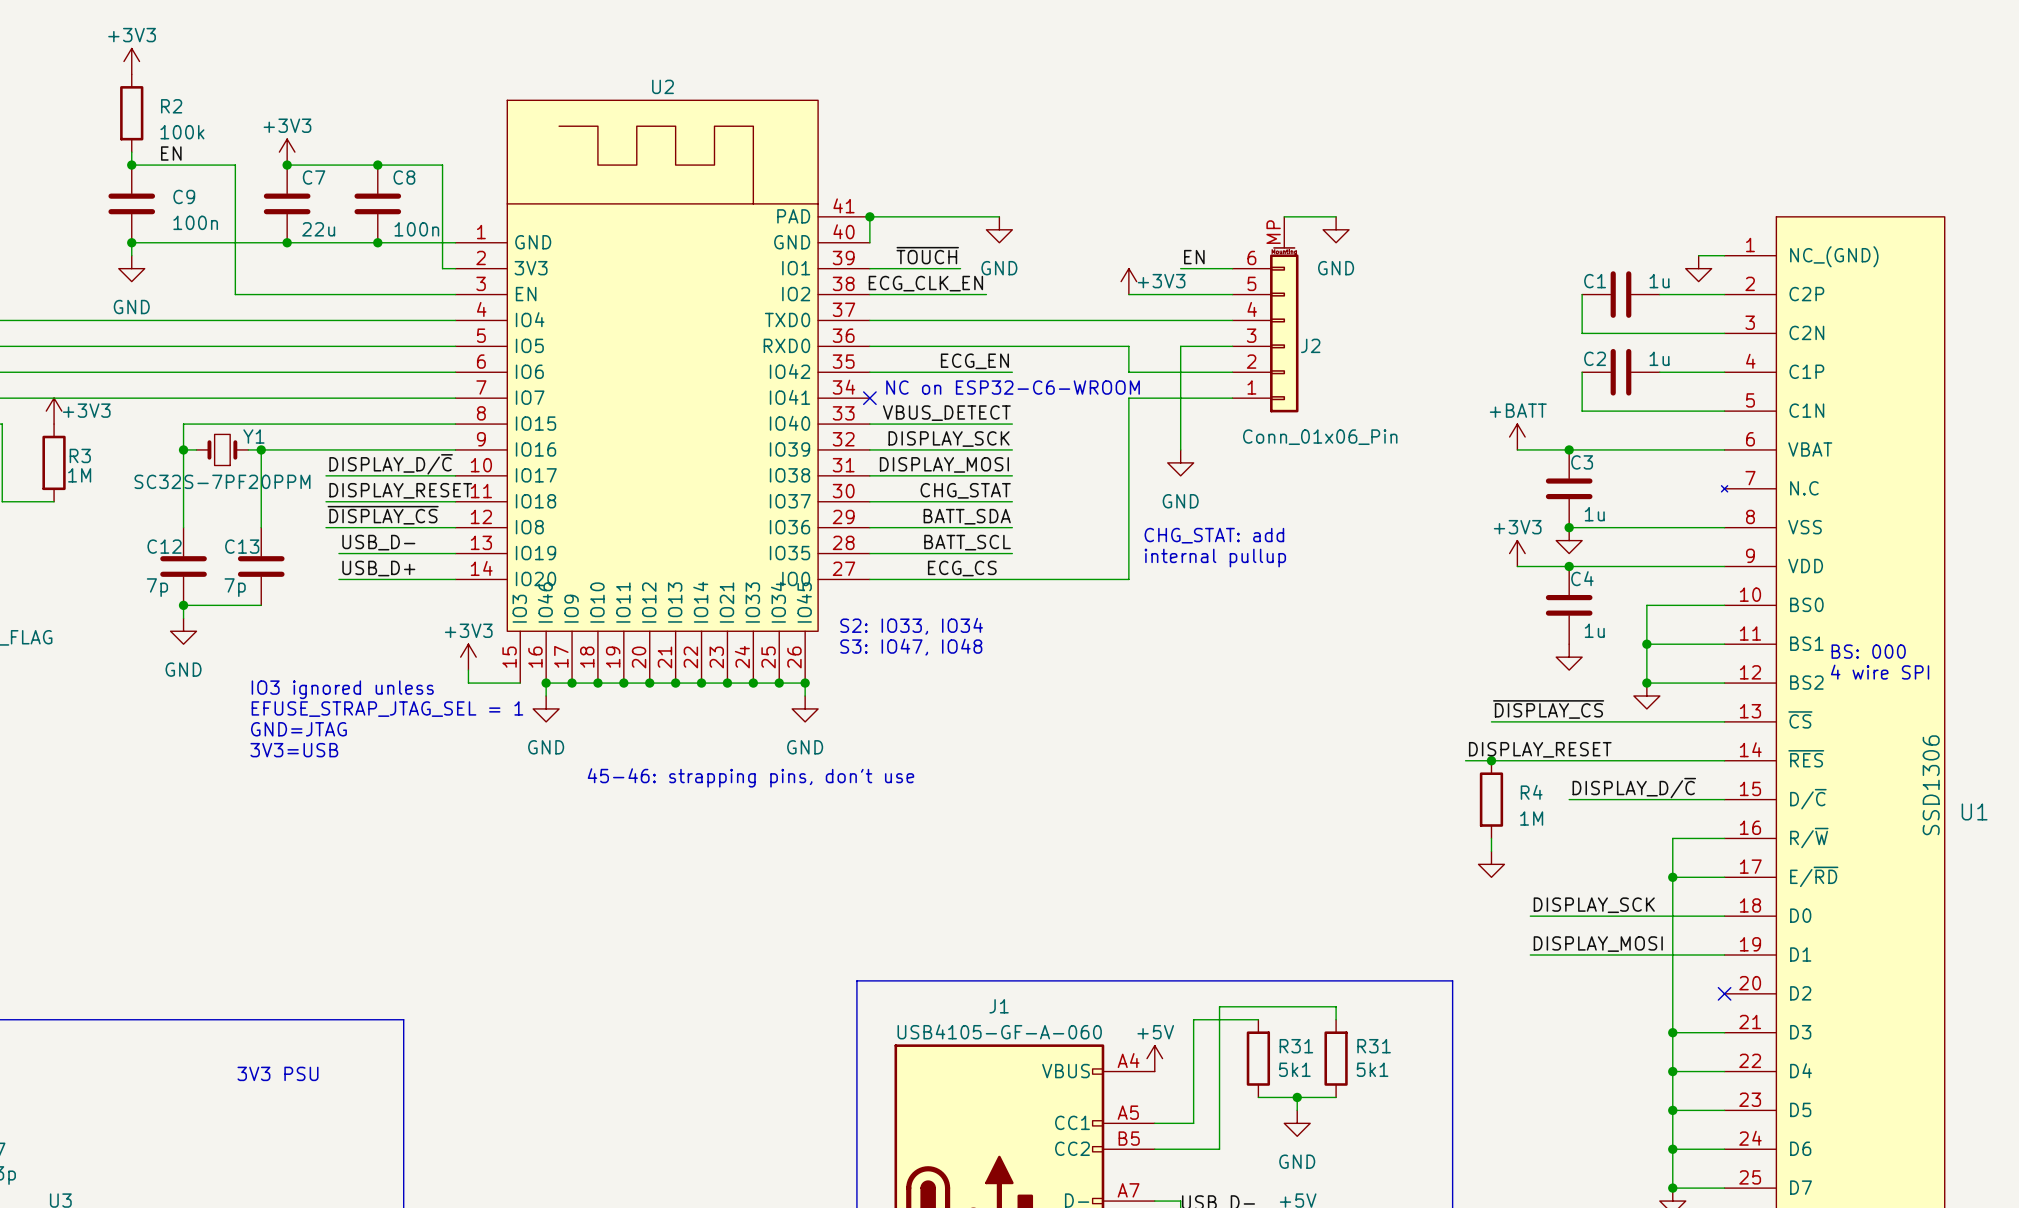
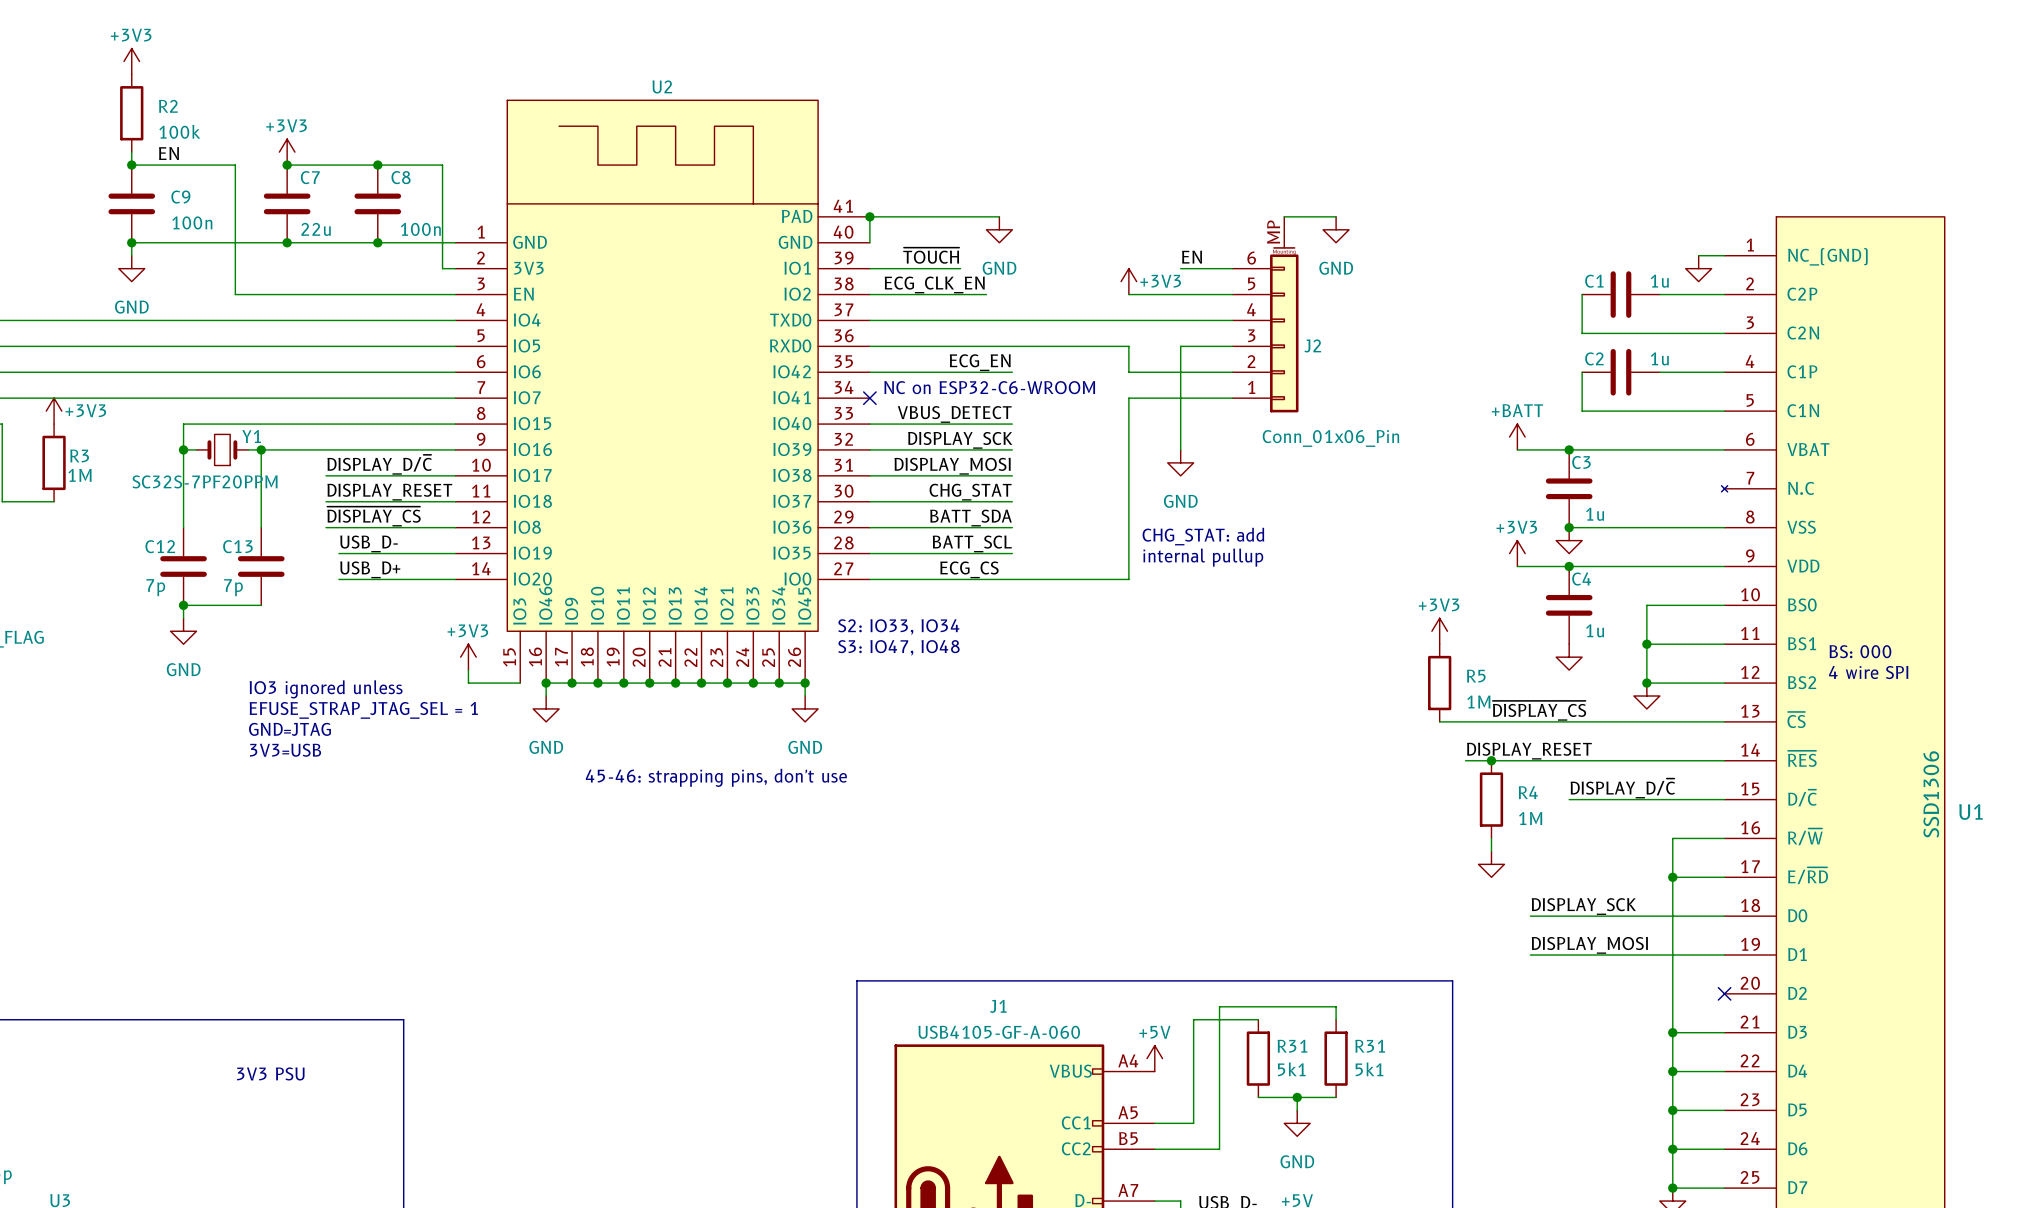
power symbol: none -> +3V3 (1439, 631)
R5: none -> 1M (1439, 683)
wire: none -> (1439, 721) (1491, 721)

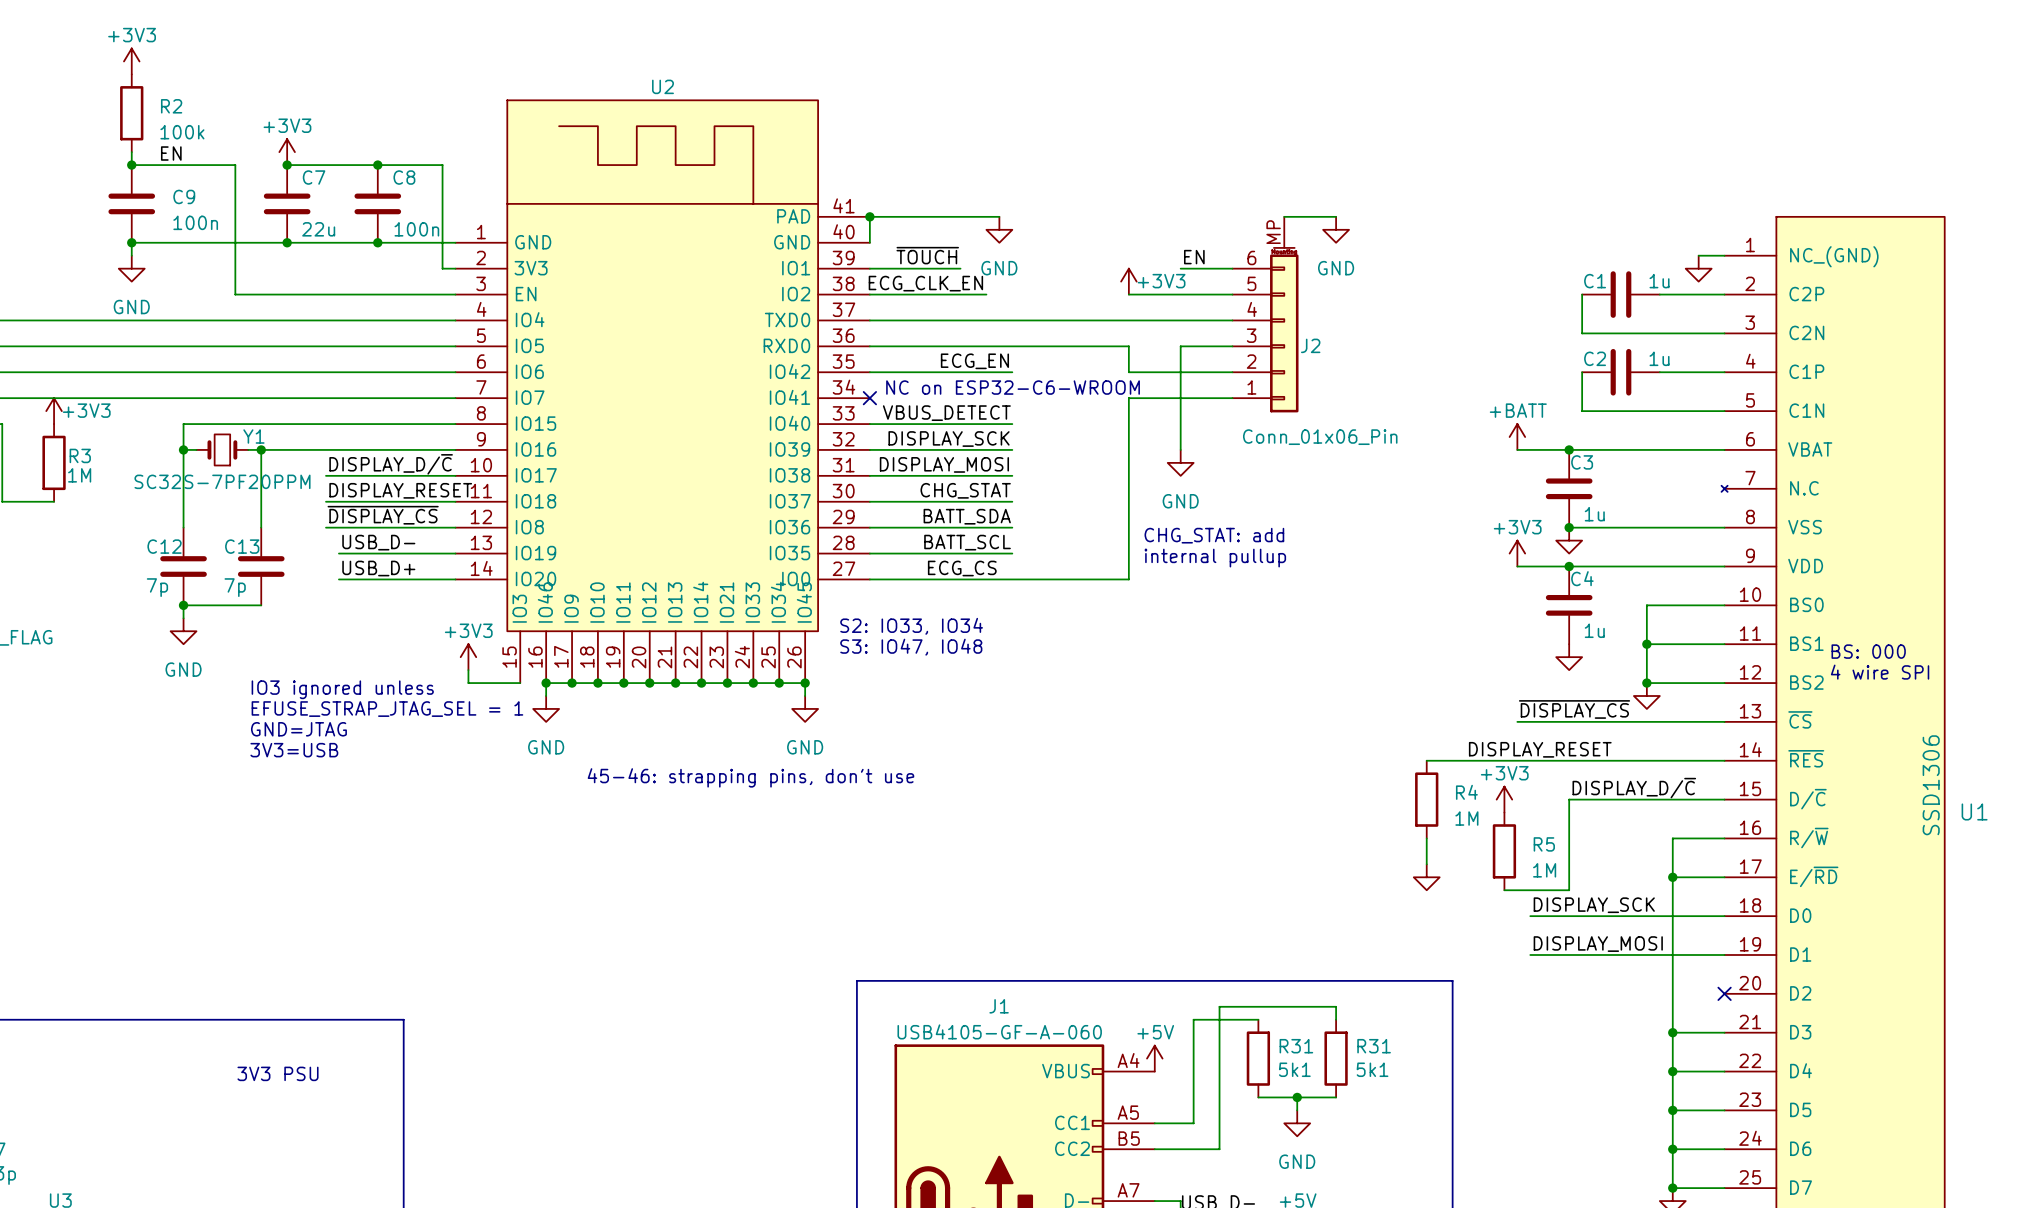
power symbol position: +3V3 (1439, 631) -> +3V3 (1504, 799)
R5 position: (1439, 683) -> (1504, 851)
label position: ~{DISPLAY_CS} (1539, 710) -> ~{DISPLAY_CS} (1574, 709)
wire: (1439, 721) (1517, 721) -> none
wire: none -> (1426, 760) (1465, 760)
junction: (1491, 760) -> none
R4 position: (1491, 799) -> (1426, 799)
wire: none -> (1569, 799) (1569, 890) (1504, 890)
wire: none -> (1426, 838) (1426, 864)
wire: (1491, 838) (1491, 851) -> none
power symbol position: (1491, 864) -> (1426, 877)

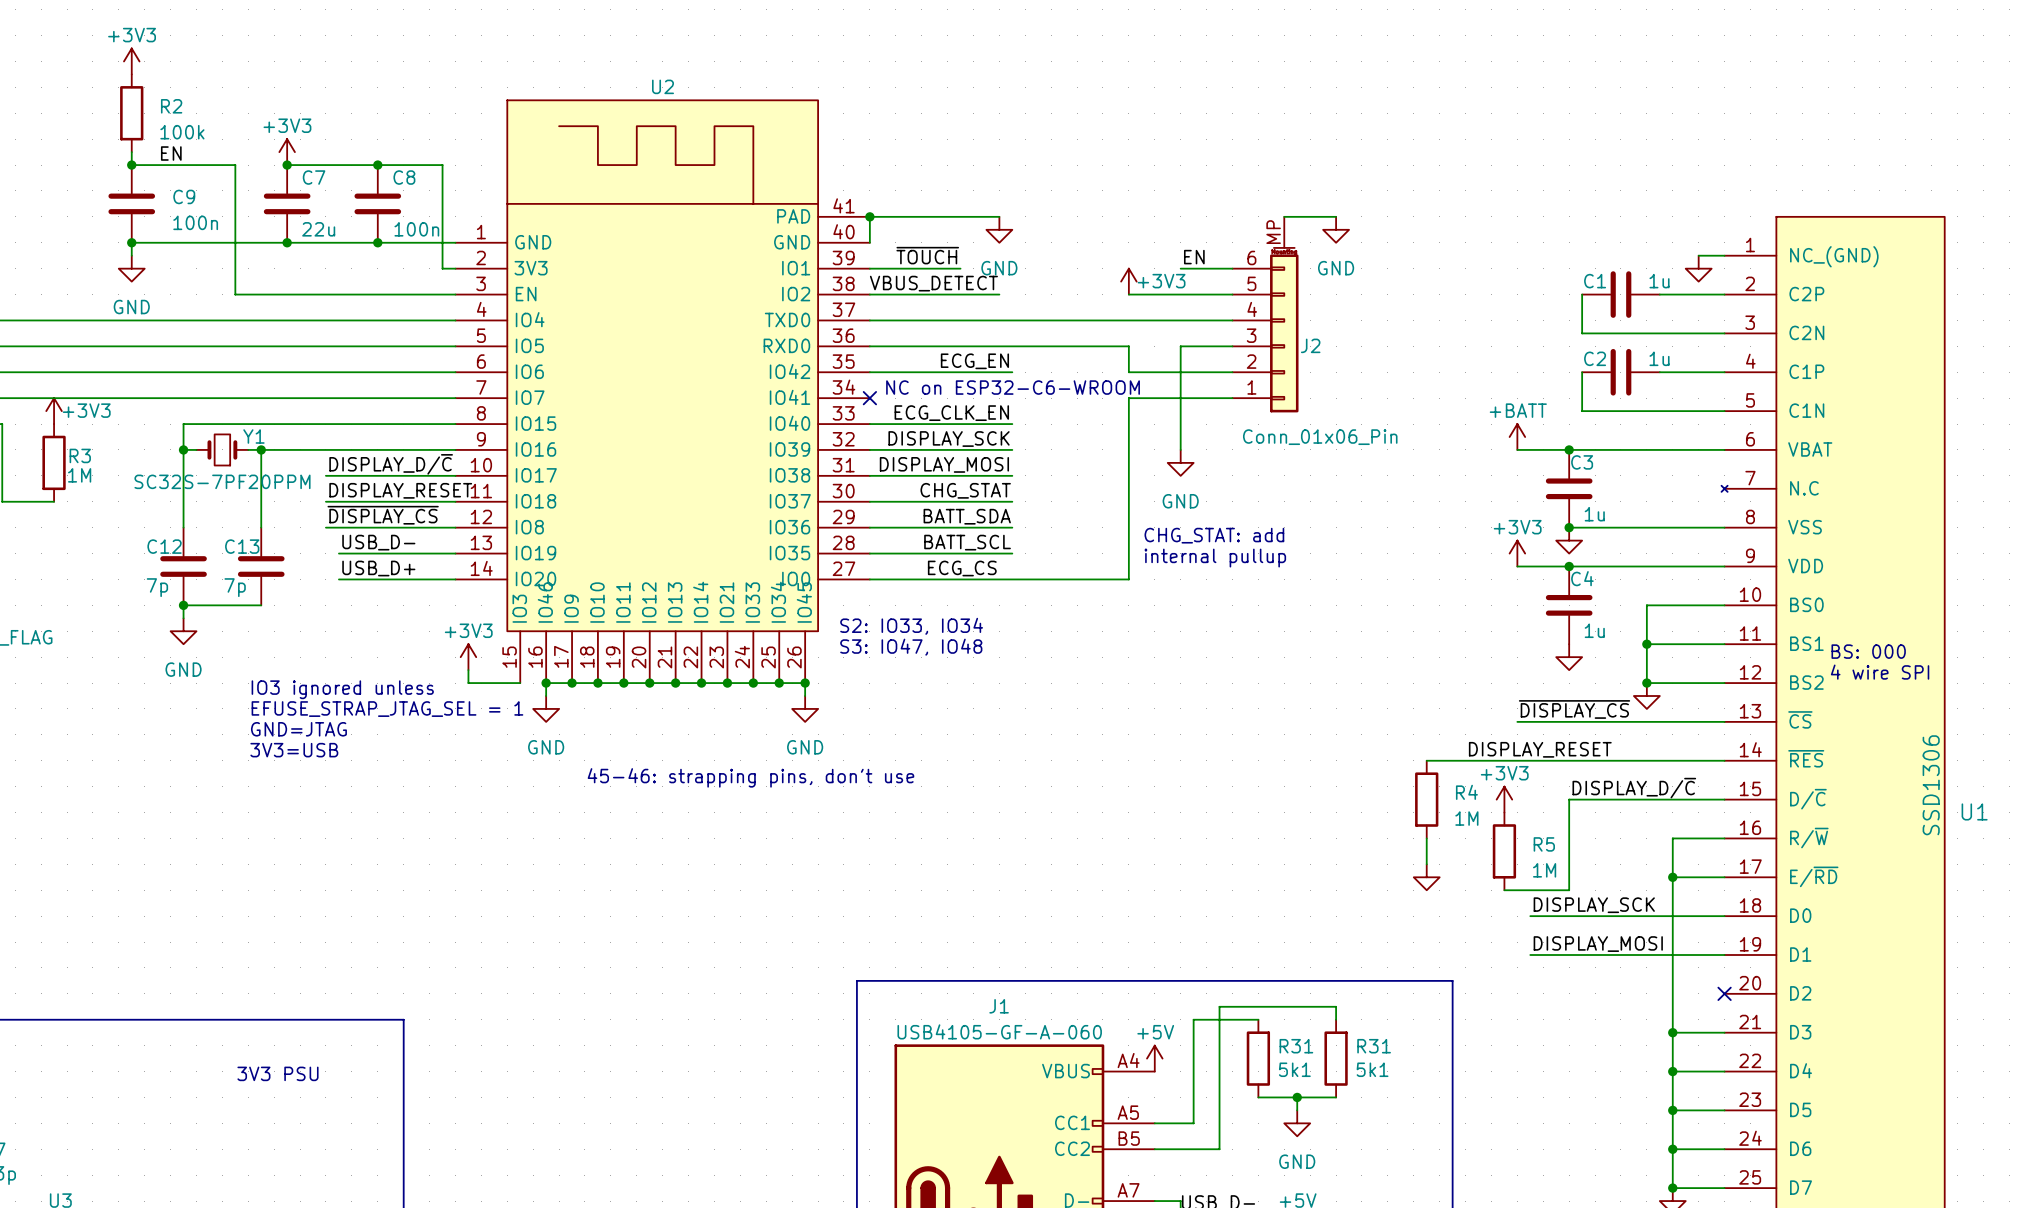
label: ECG_CLK_EN (925, 283) -> none
label: none -> VBUS_DETECT (933, 283)
wire: none -> (986, 294) (999, 294)
label: VBUS_DETECT (946, 413) -> ECG_CLK_EN (951, 413)

